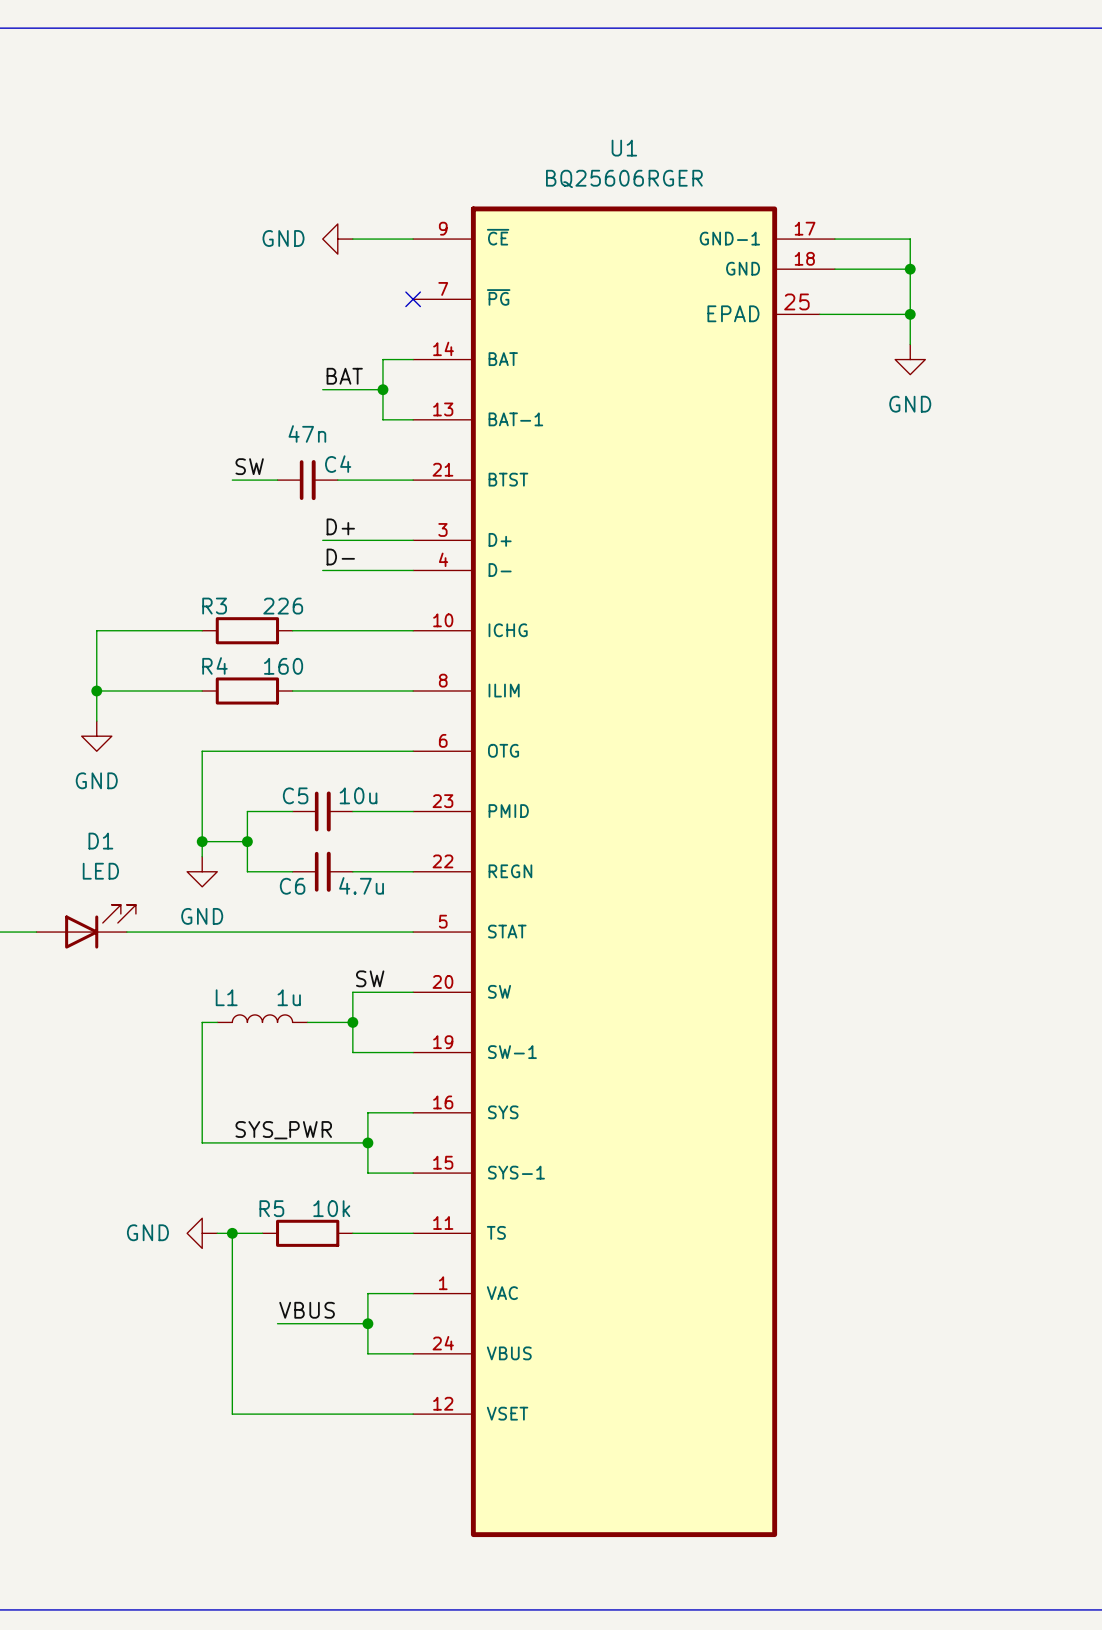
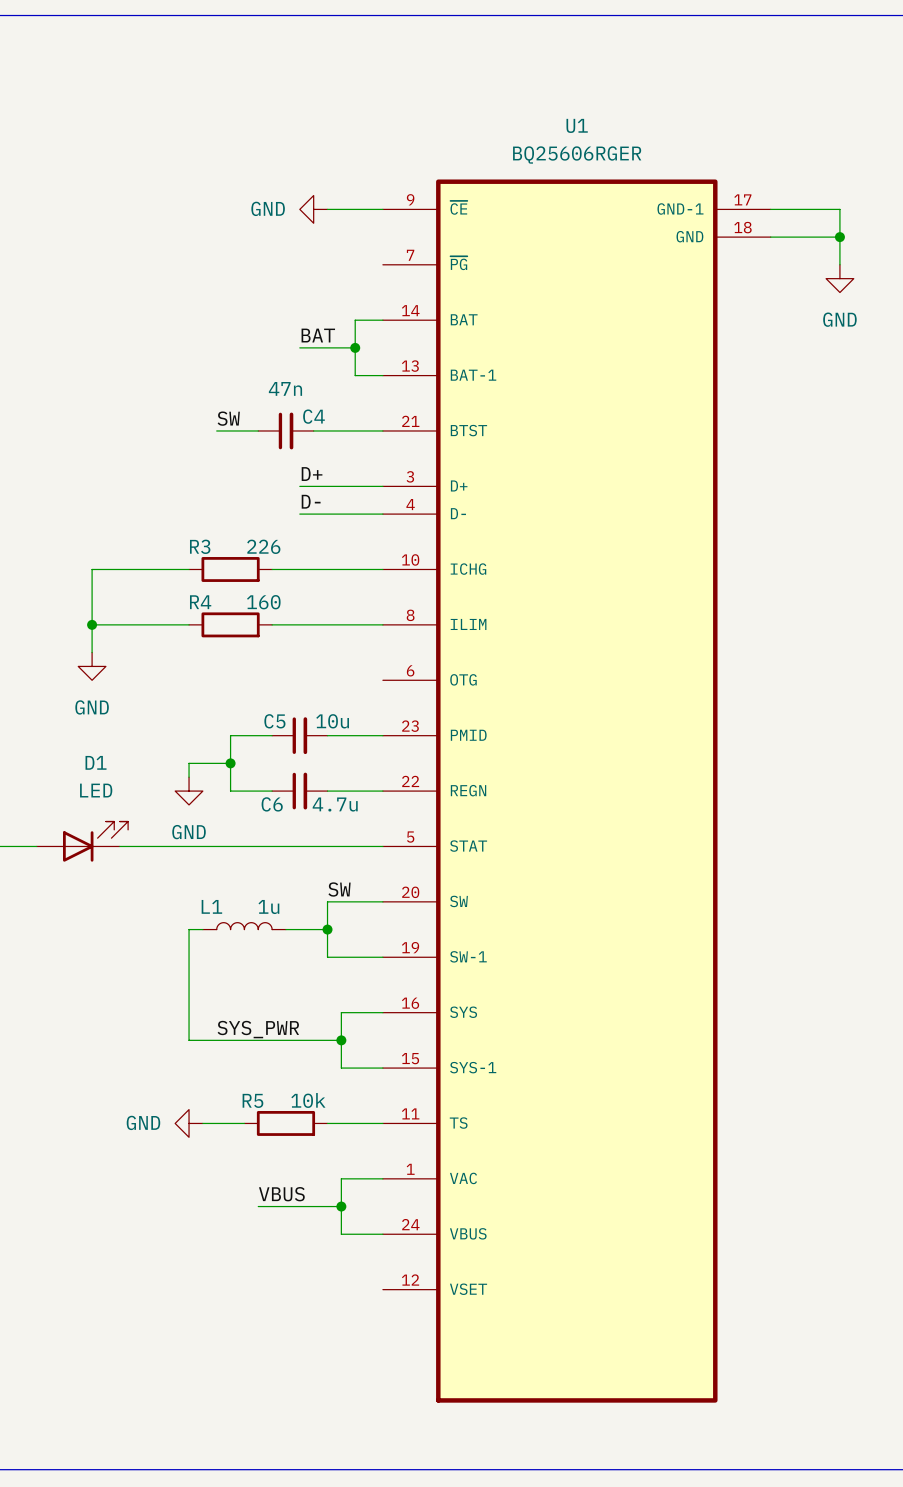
U1 symbol: [413, 206, 835, 1538] -> [382, 179, 771, 1403]
no-connect mark: (413, 299) -> none
wire: (910, 299) (910, 344) -> none
wire: (819, 314) (910, 314) -> none
junction: (910, 314) -> none
power symbol position: GND (910, 359) -> GND (839, 278)
wire: (413, 751) (202, 751) (202, 841) -> none
junction: (202, 841) -> none
wire: (232, 1233) (232, 1414) (413, 1414) -> none
junction: (232, 1233) -> none

